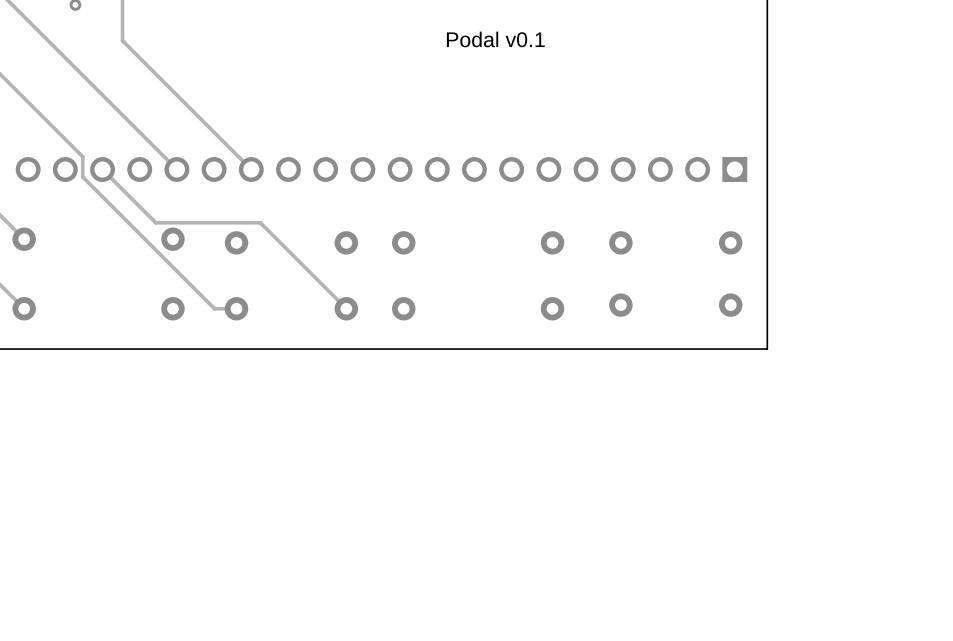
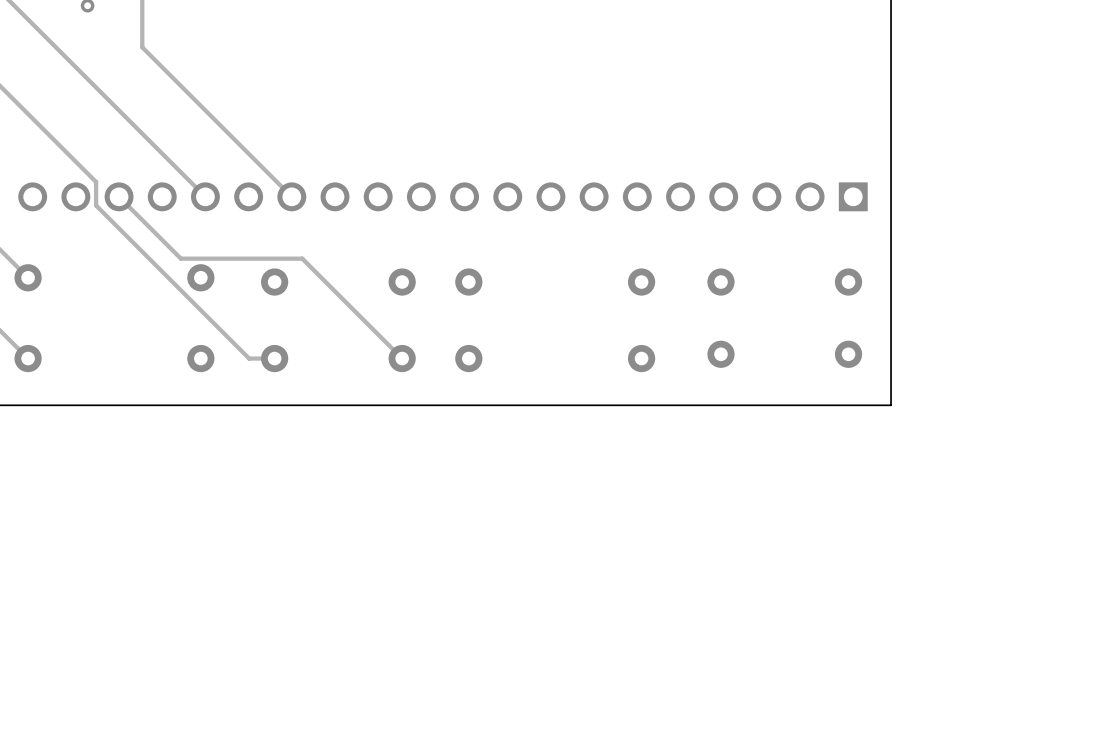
text: Podal v0.1 (495, 39) -> none

